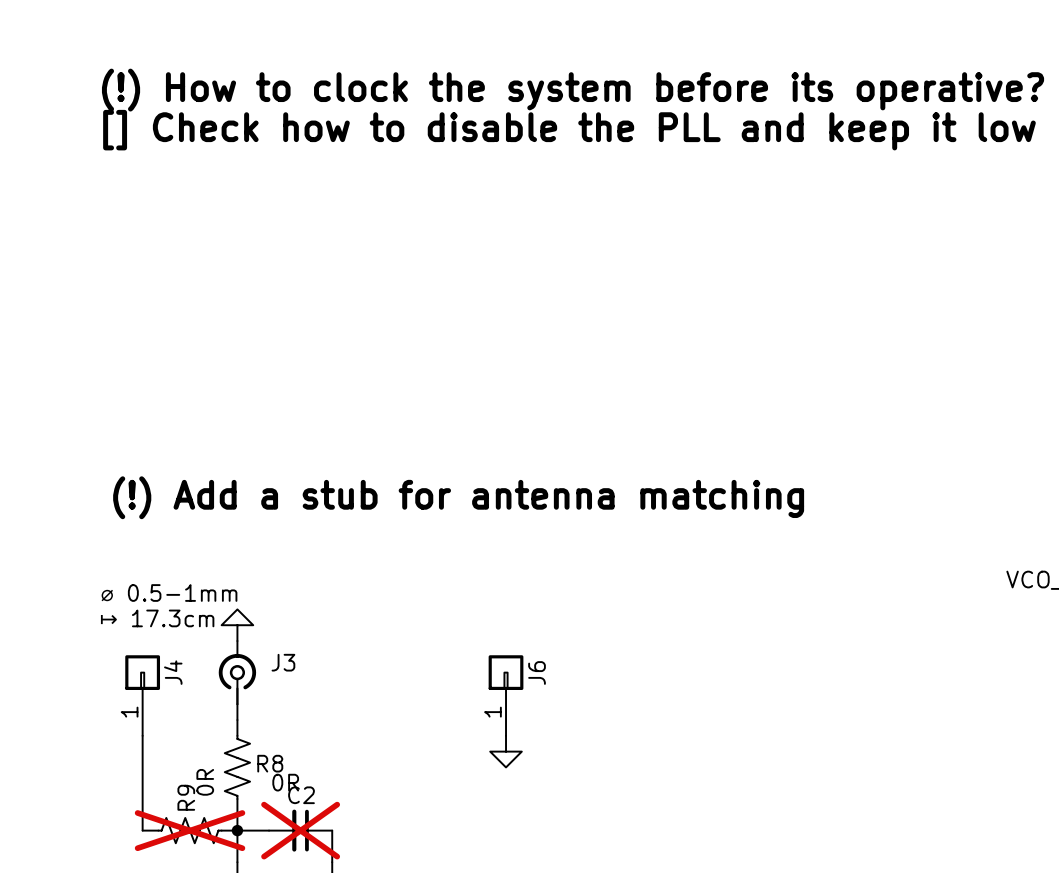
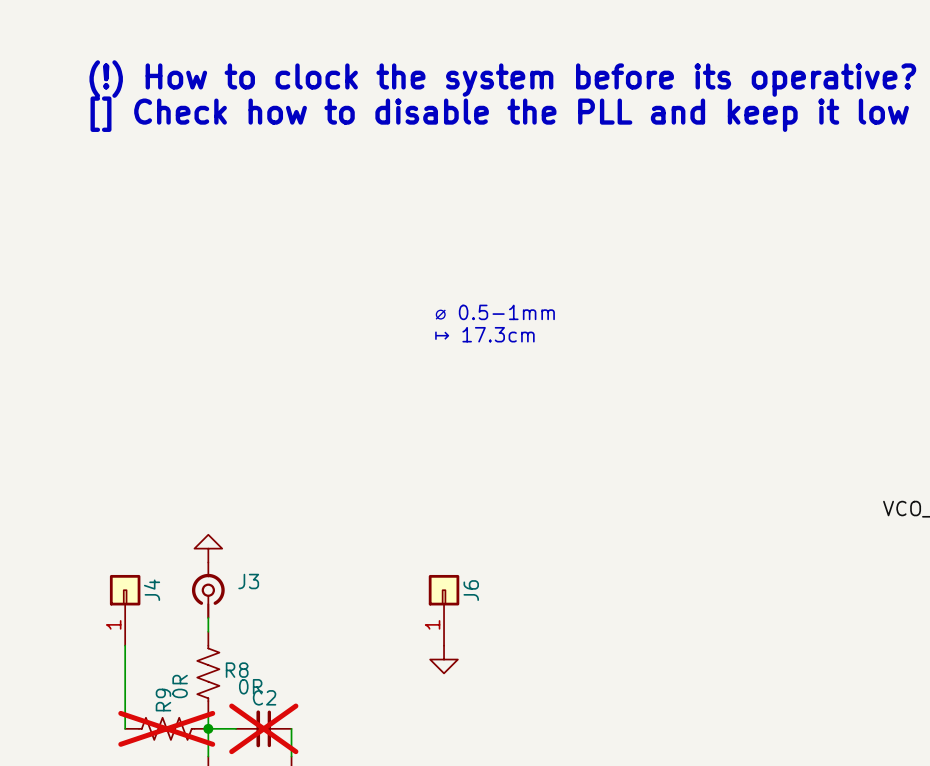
text: none -> ⌀ 0.5-1mm (494, 312)
text: none -> ↦ 17.3cm (484, 334)
text: (!) Add a stub for antenna matching (458, 497) -> none
text: ⌀ 0.5-1mm (168, 593) -> none
text: ↦ 17.3cm (157, 618) -> none

